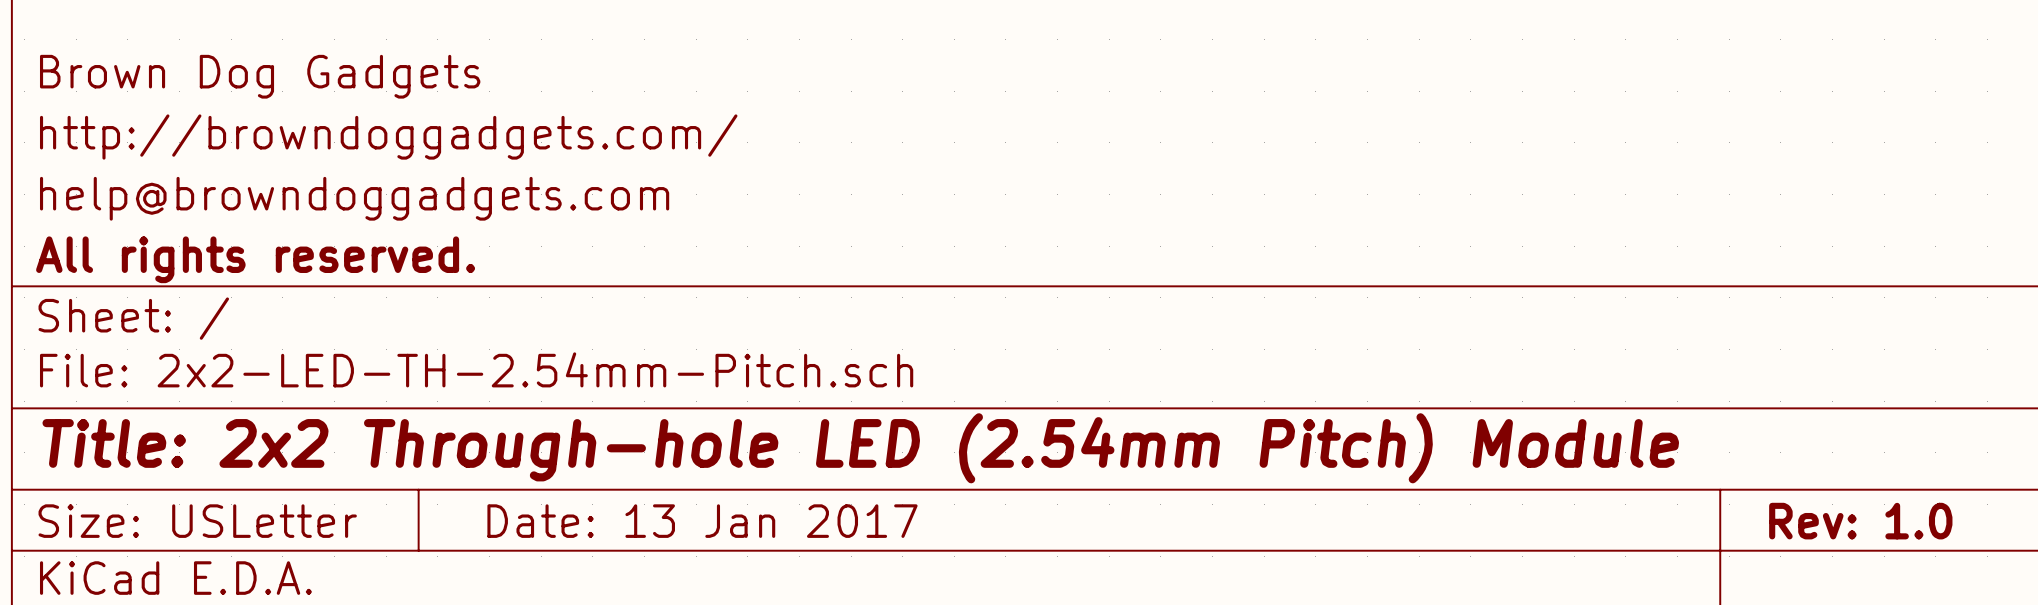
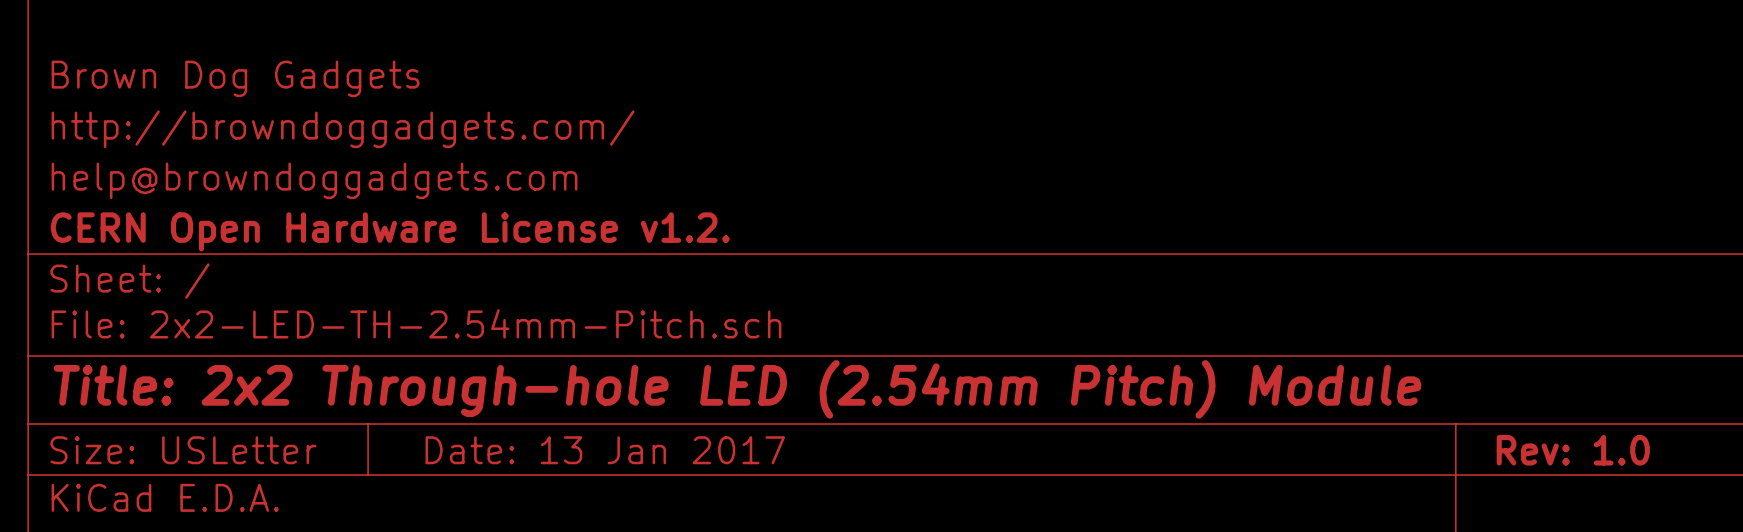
title block: All rights reserved. (255, 259) -> CERN Open Hardware License v1.2. (390, 231)

